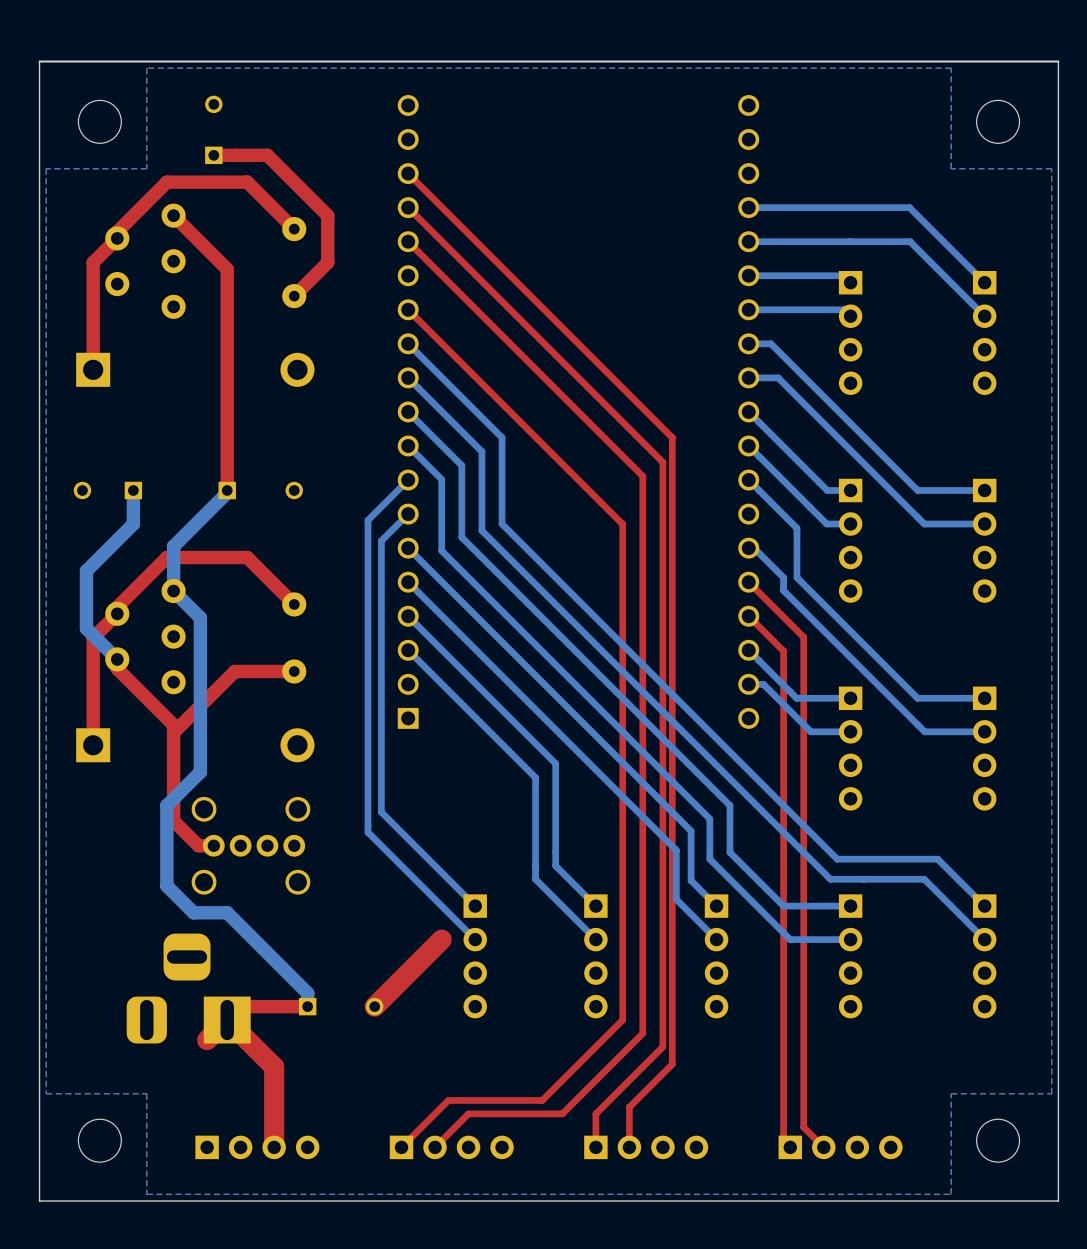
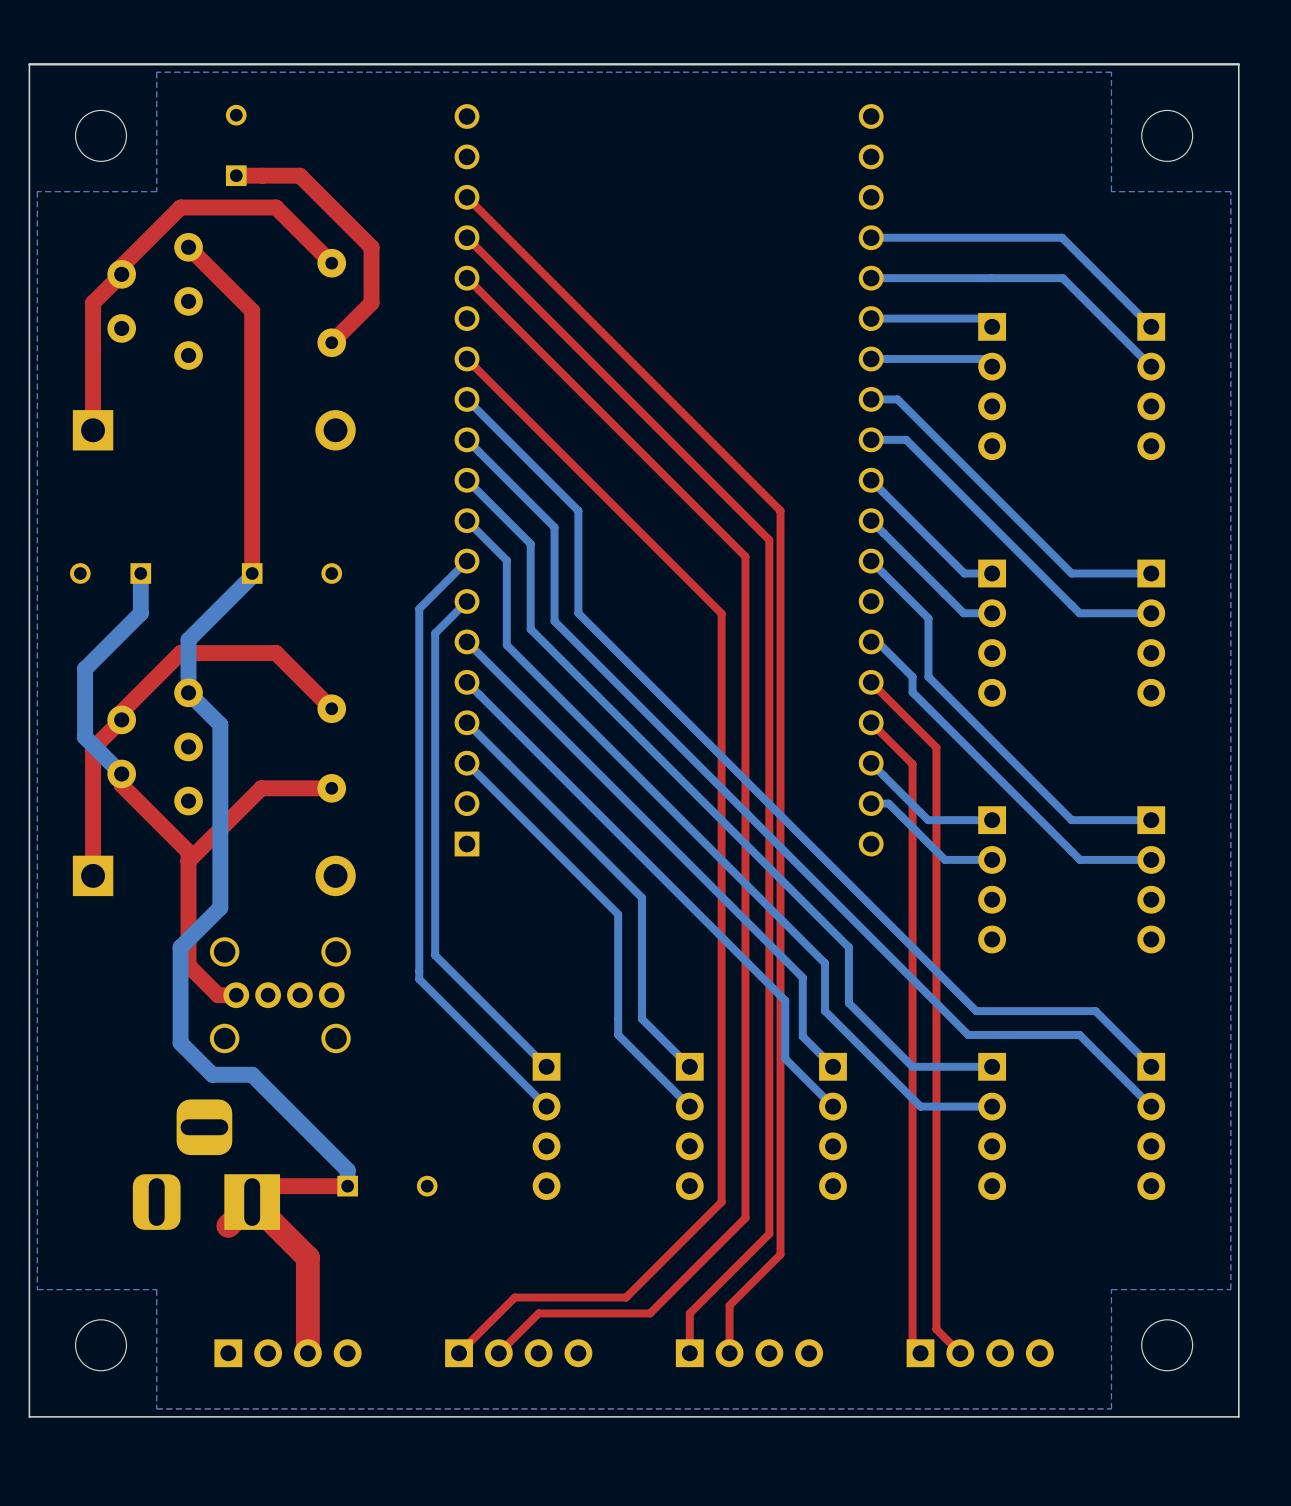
top track: (441, 939) (374, 1006) -> none

